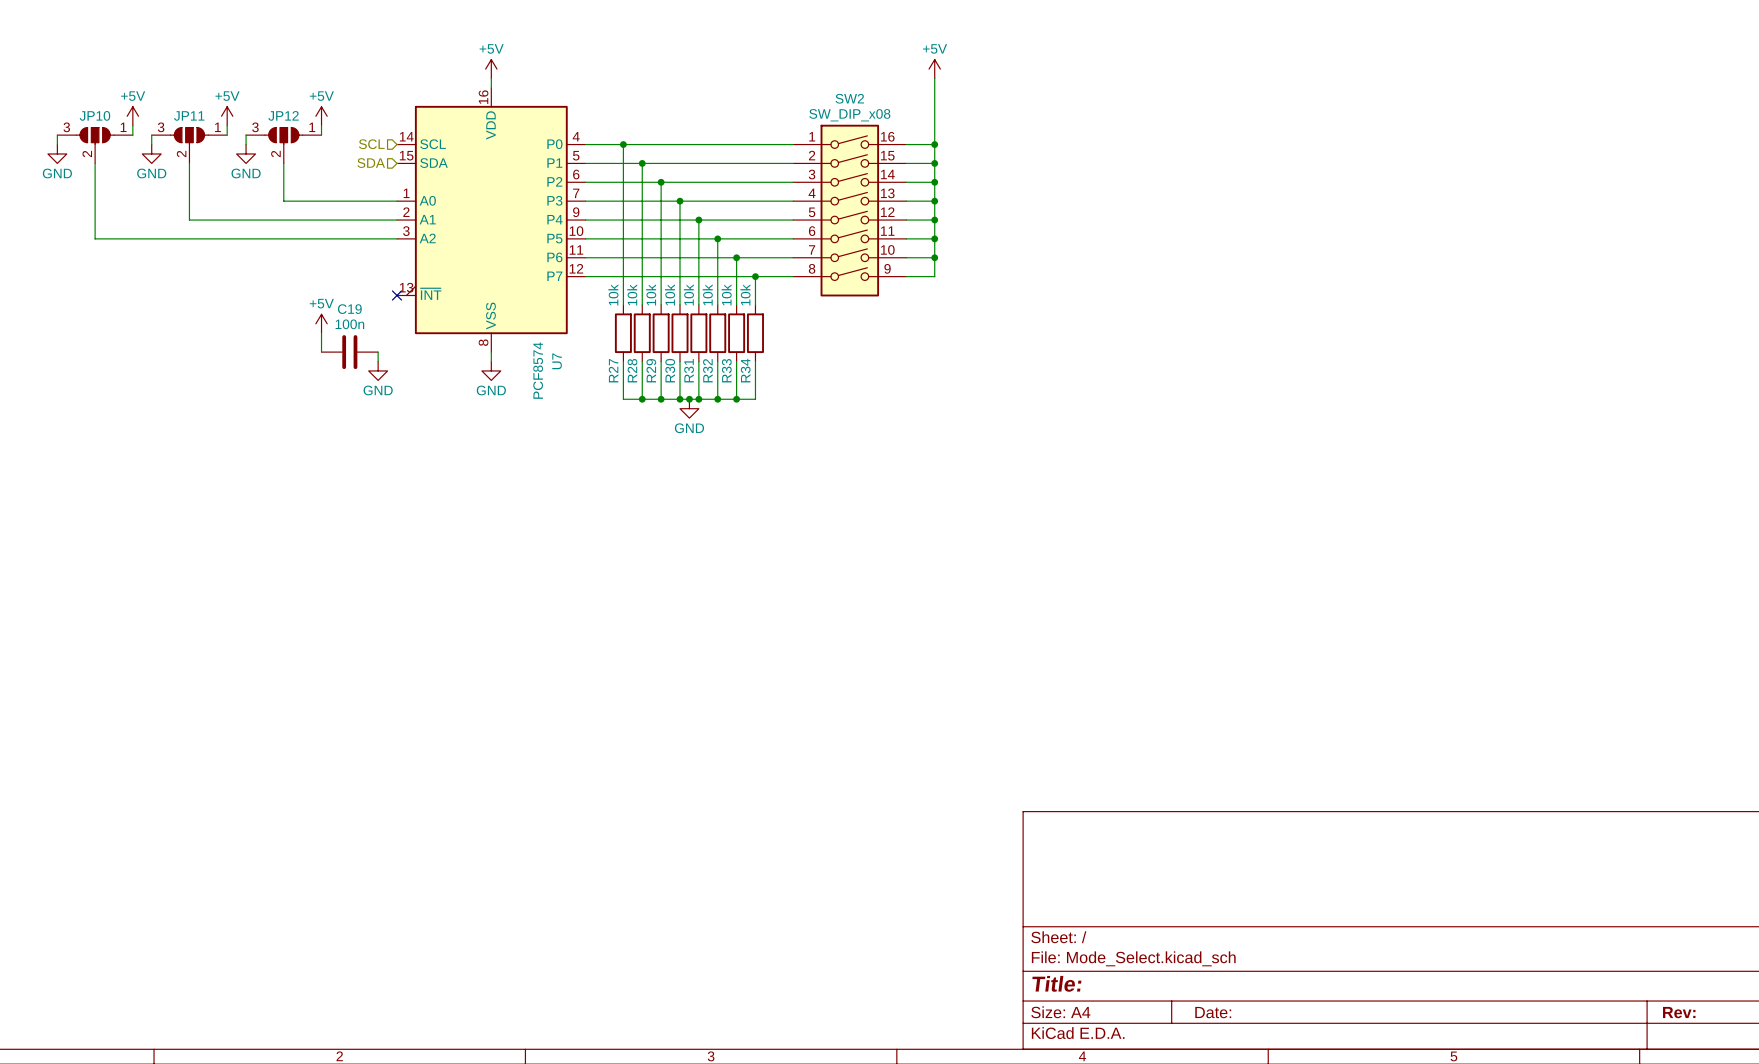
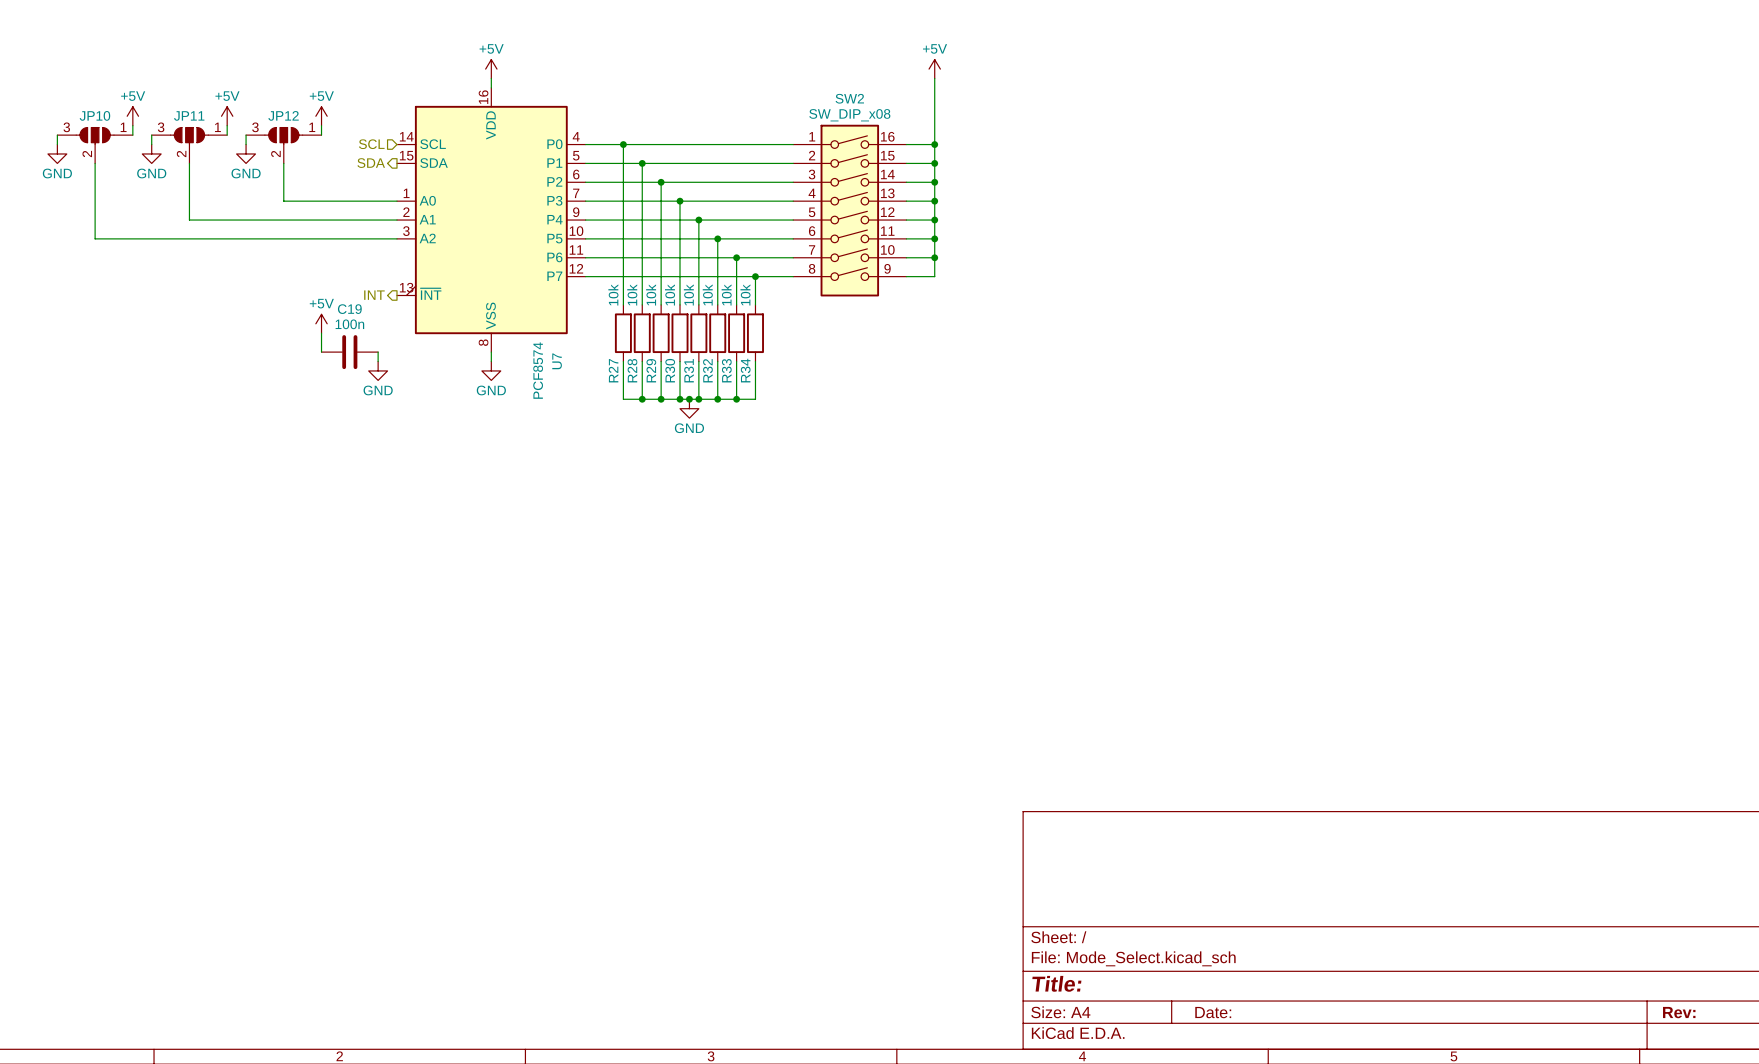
hierarchical label shape: input (371, 163) -> output (371, 163)
hierarchical label: none -> INT (374, 295)
no-connect mark: (396, 295) -> none

